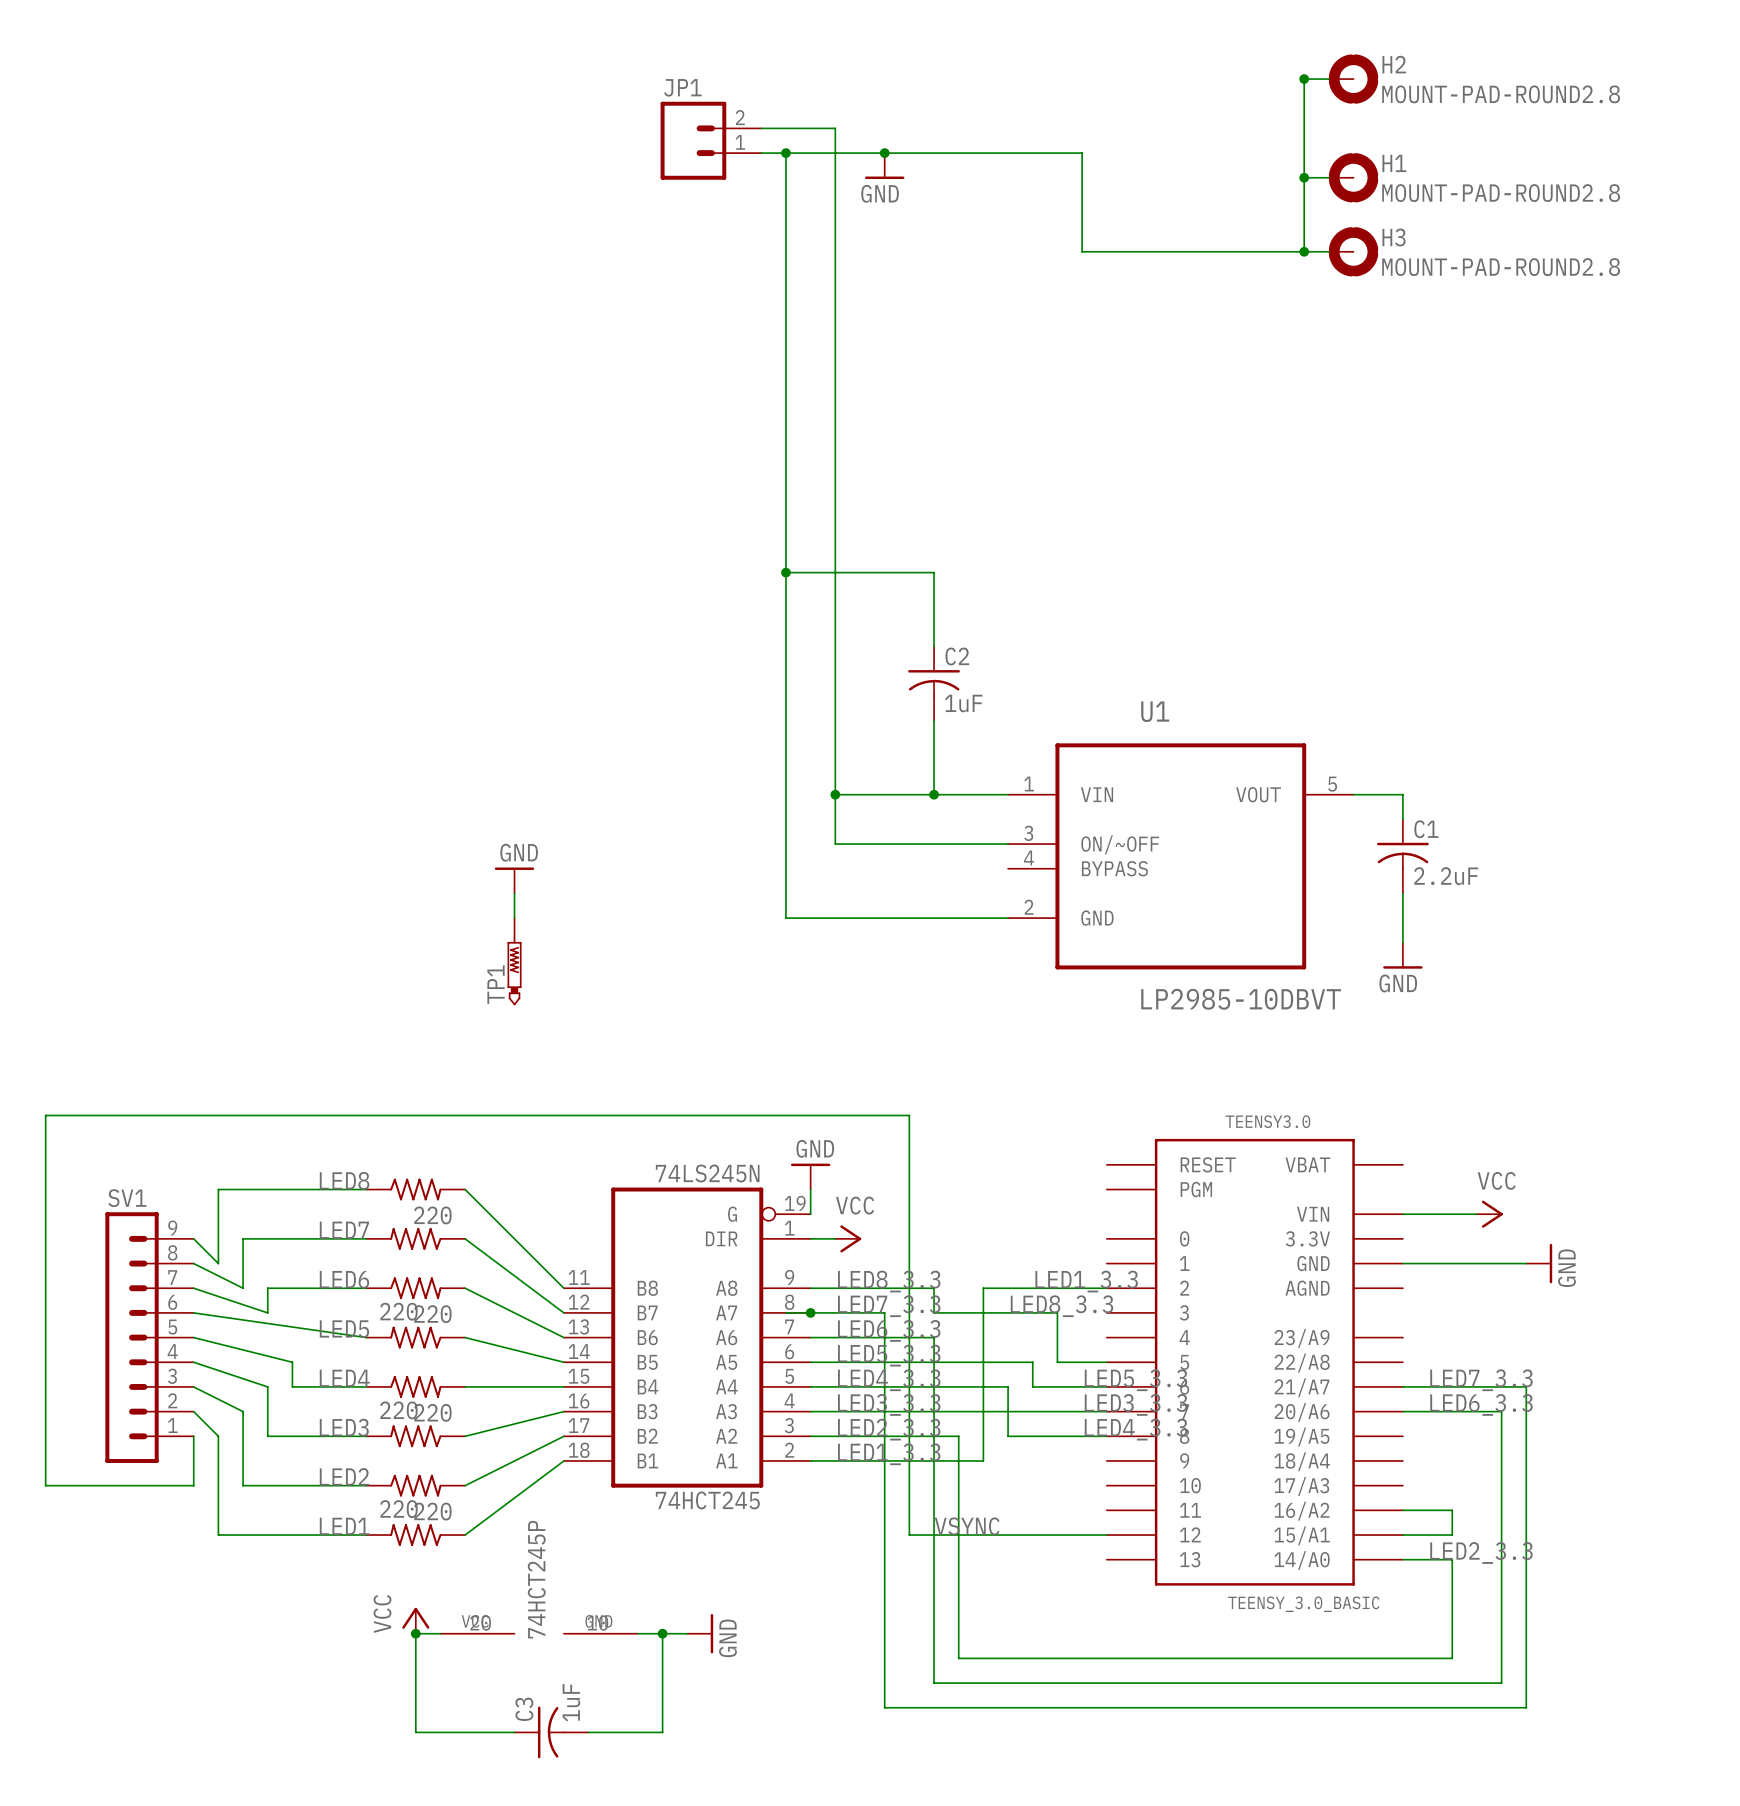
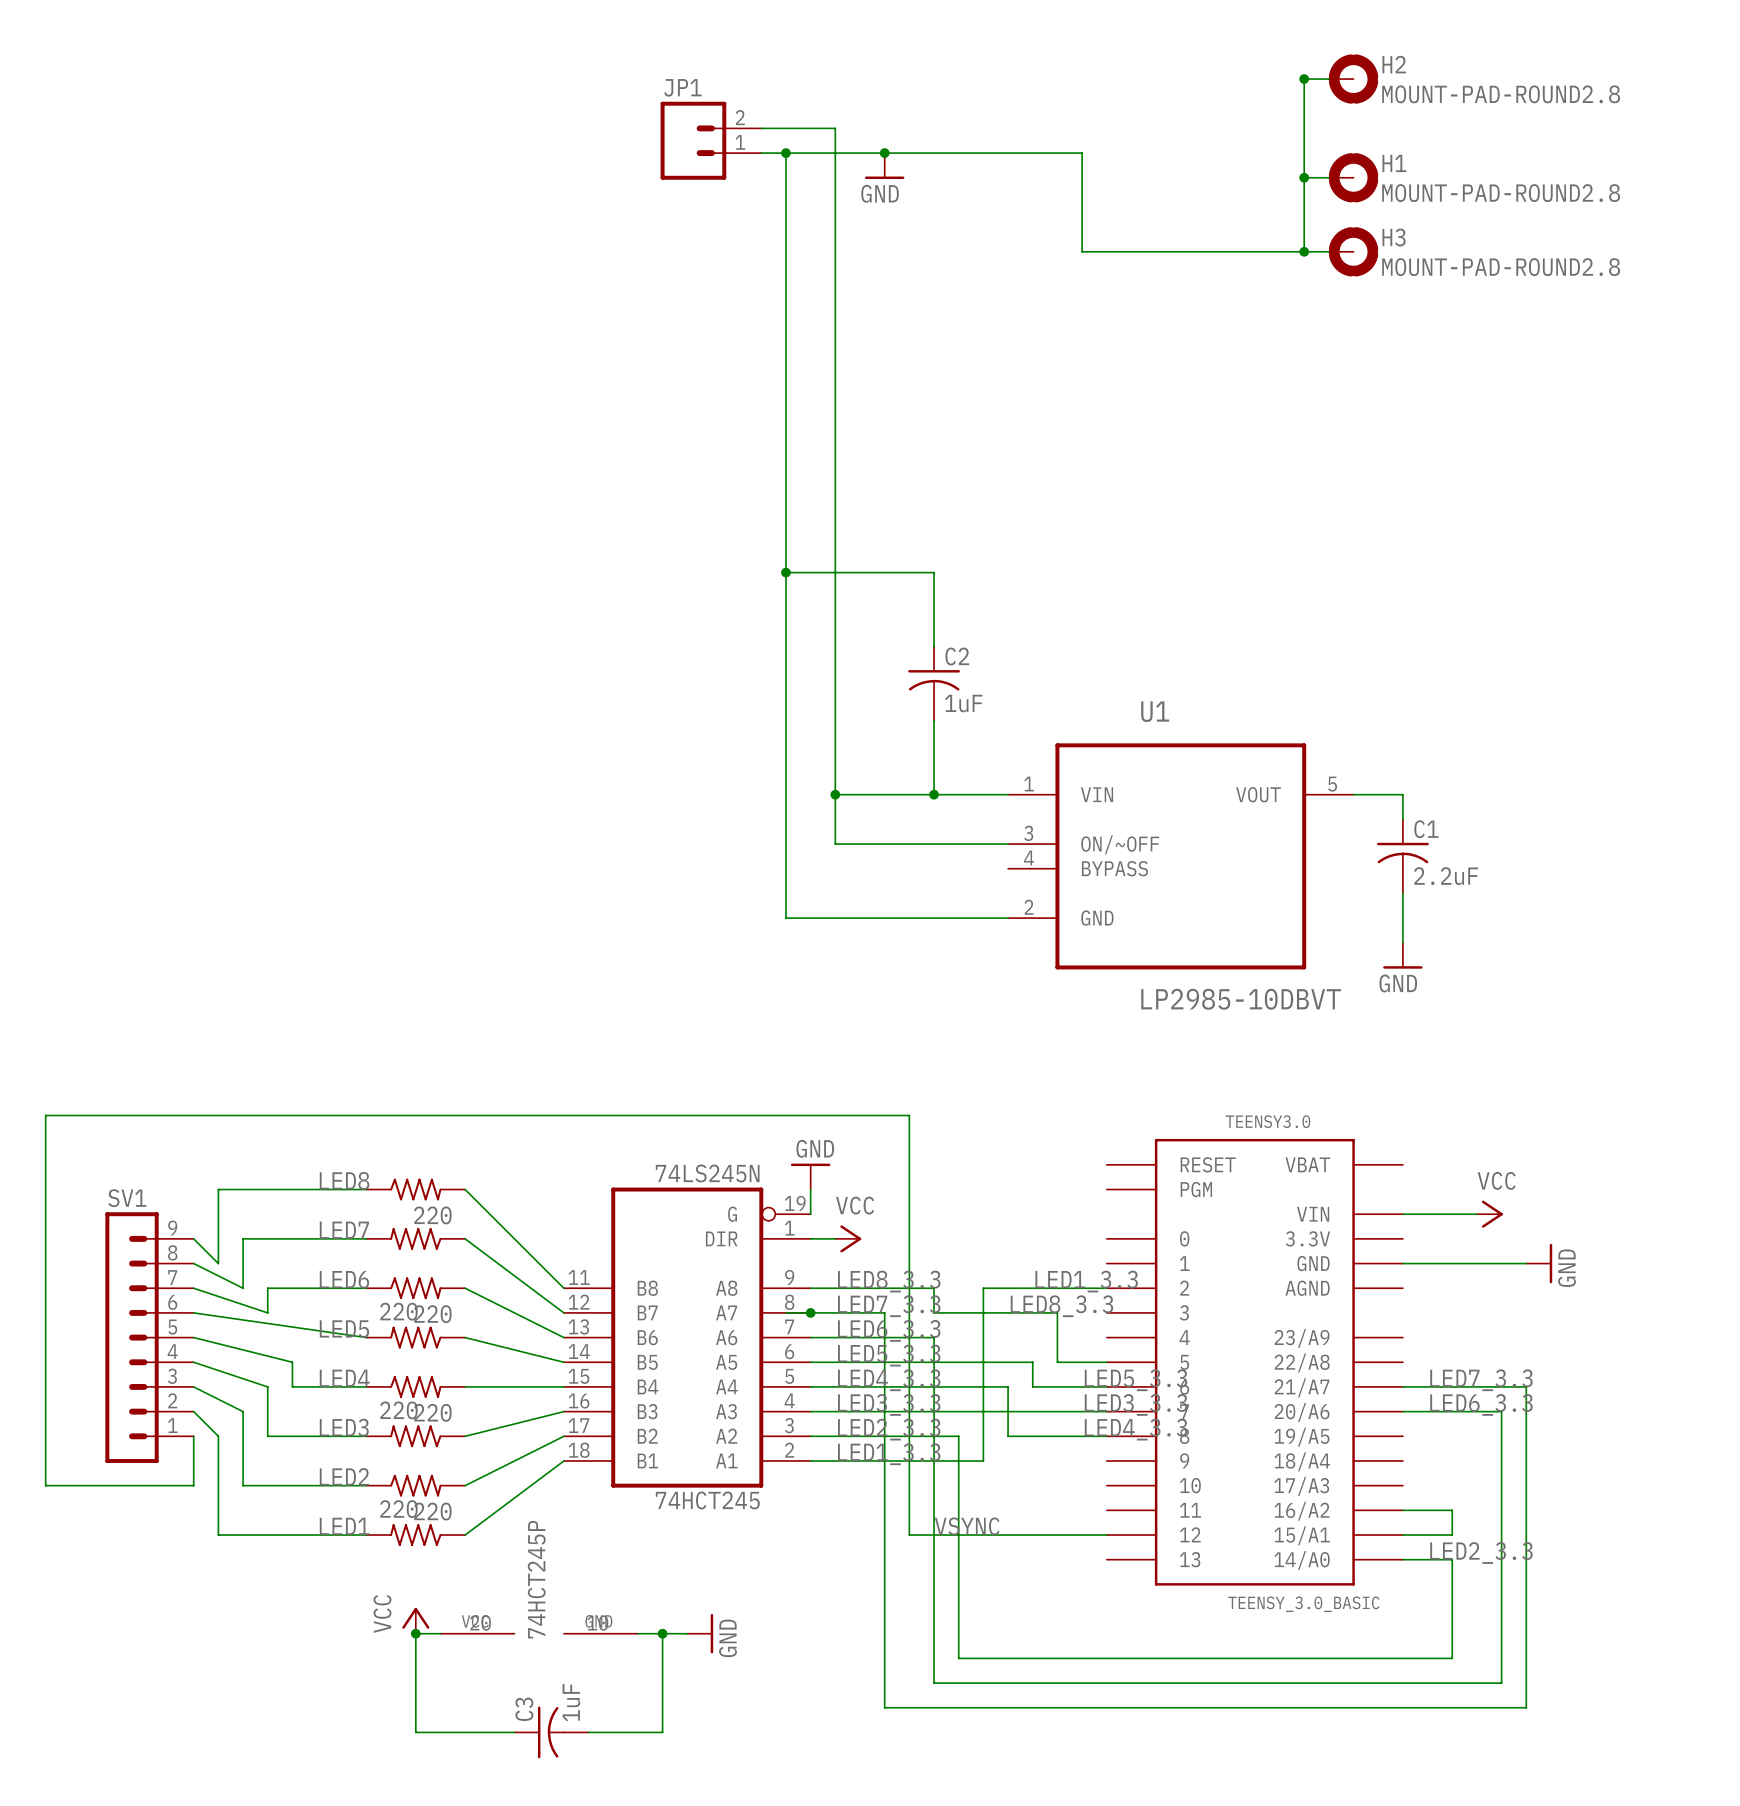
power symbol: GND (514, 880) -> none
wire: (514, 893) (514, 918) -> none
TP1: (514, 961) -> none

